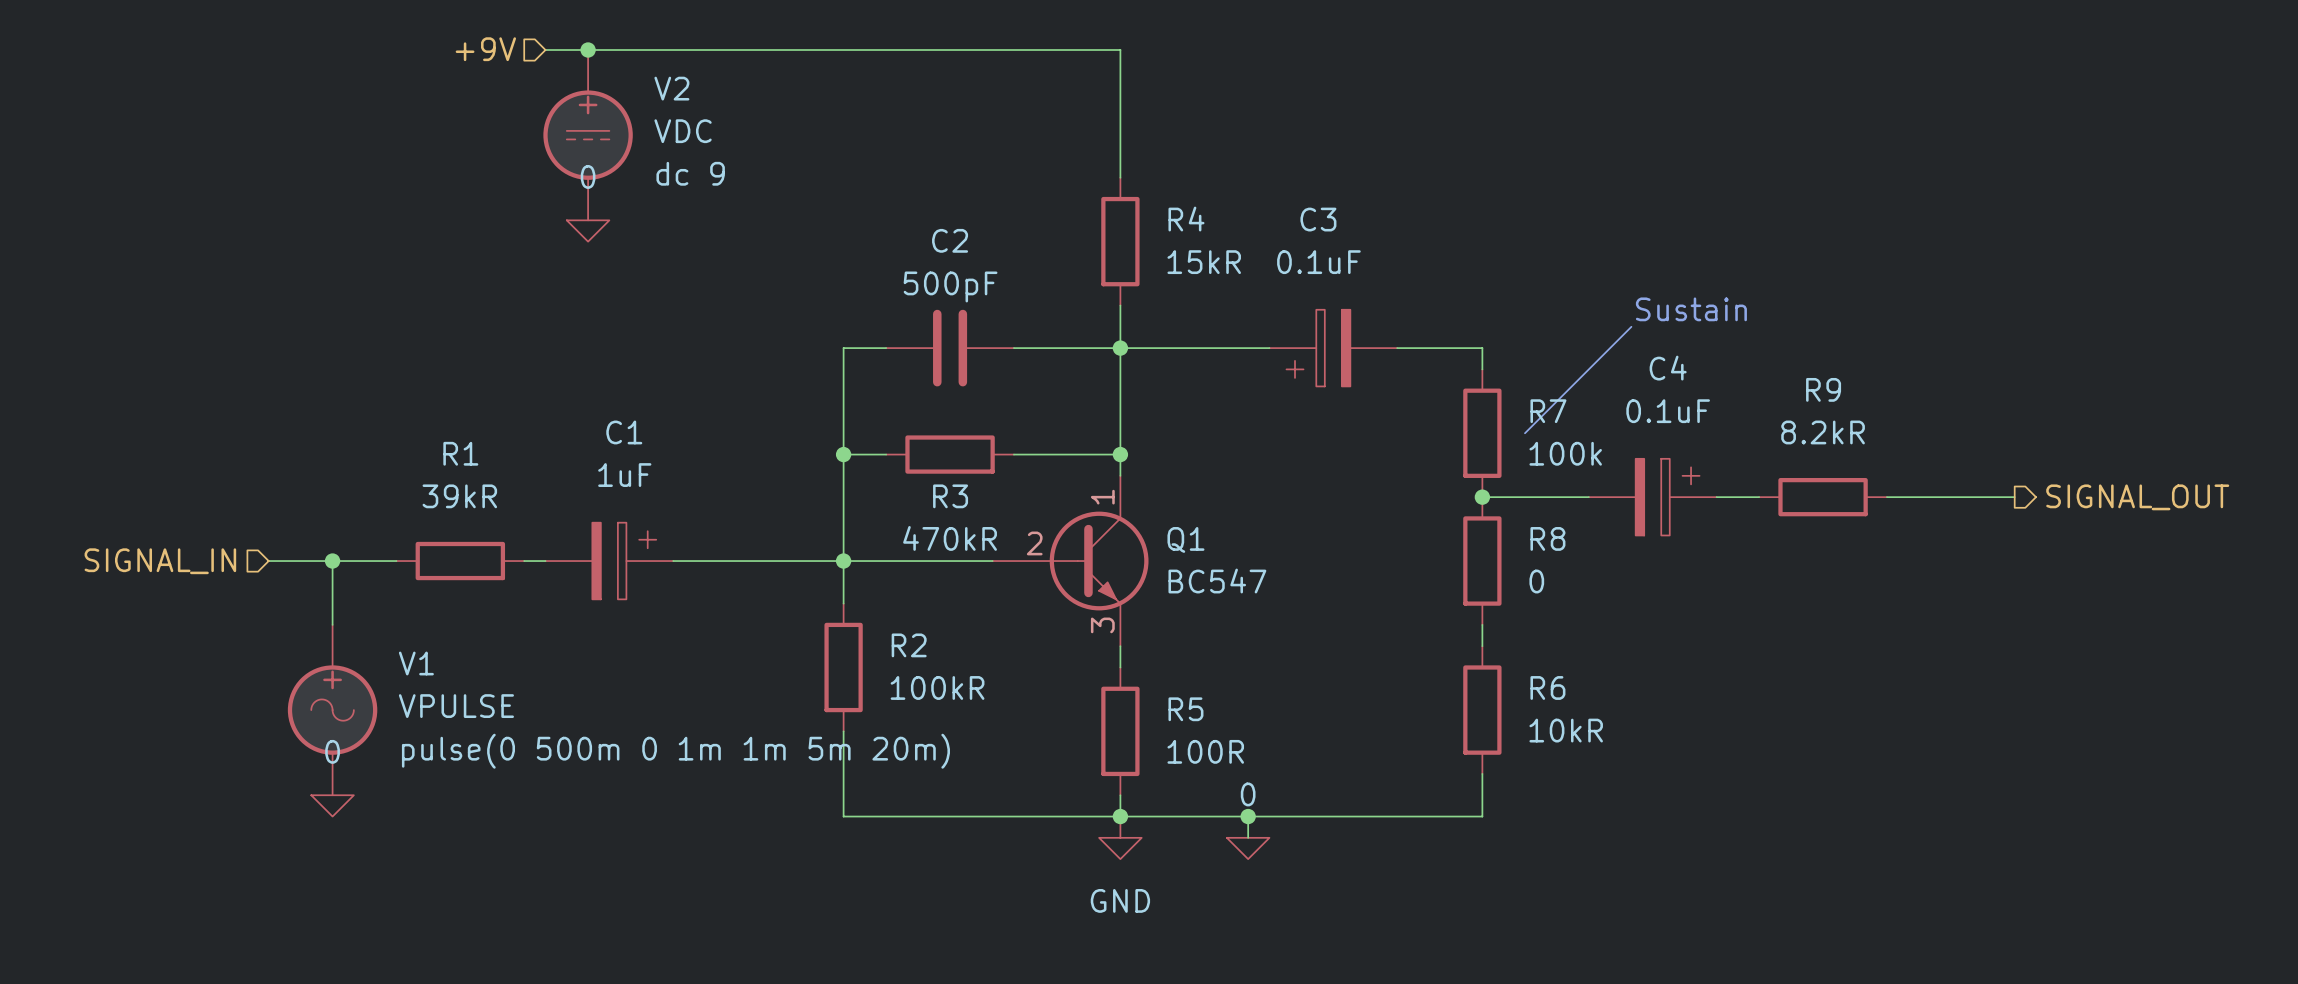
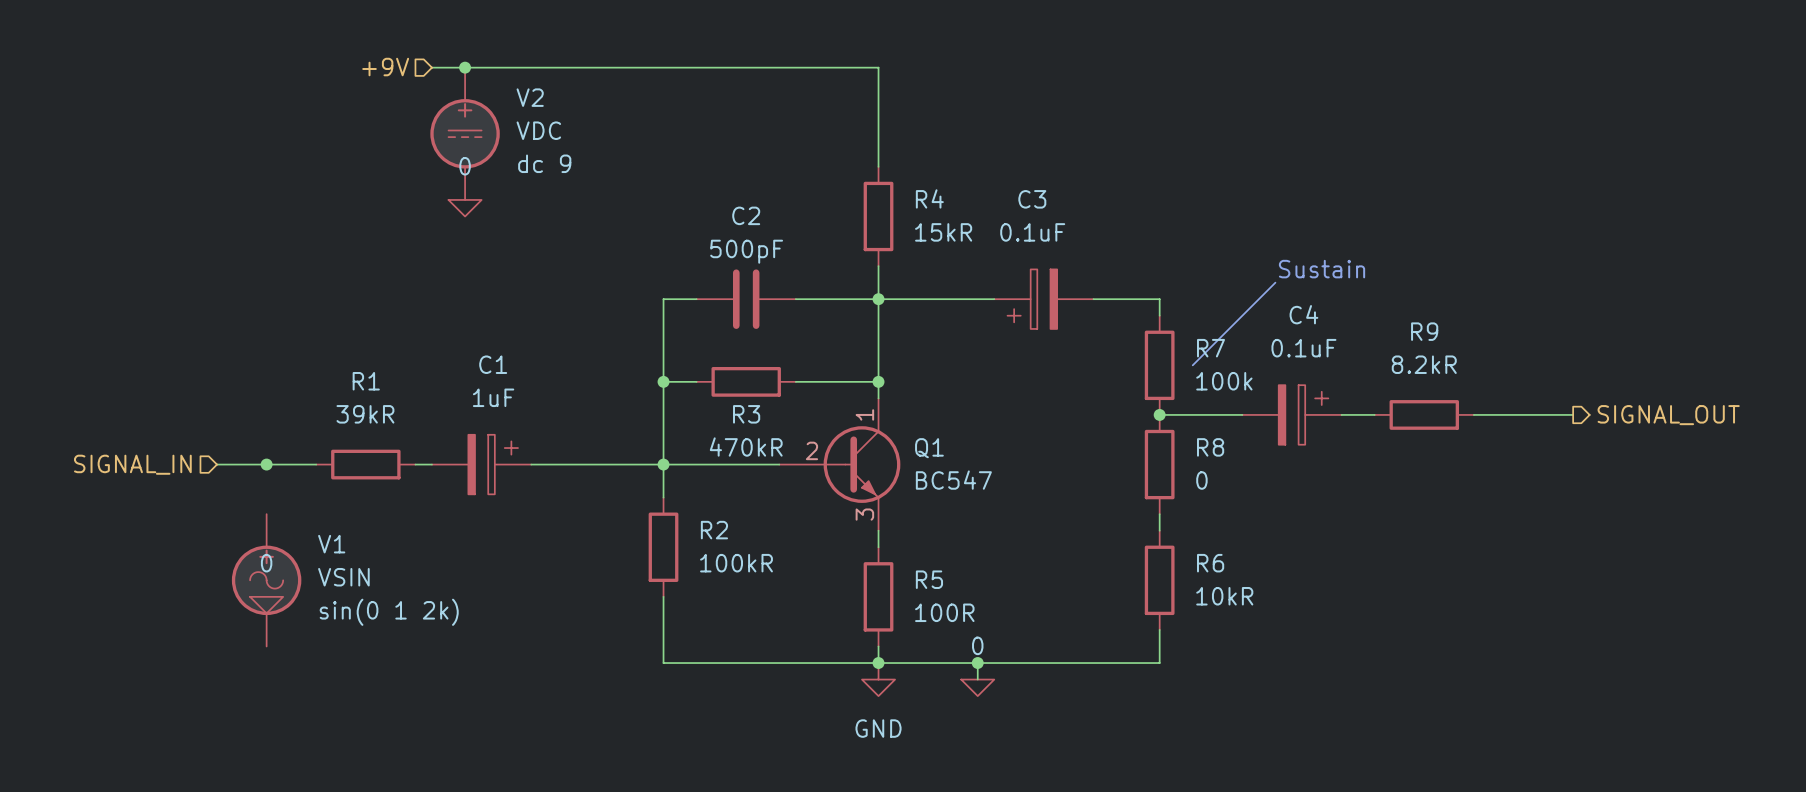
wire: (332, 561) (332, 624) -> none
V1 value: VPULSE (456, 706) -> VSIN (343, 577)
V1 text: pulse(0 500m 0 1m 1m 5m 20m) (675, 751) -> sin(0 1 2k) (389, 612)
power symbol position: 0 (332, 805) -> 0 (266, 605)

